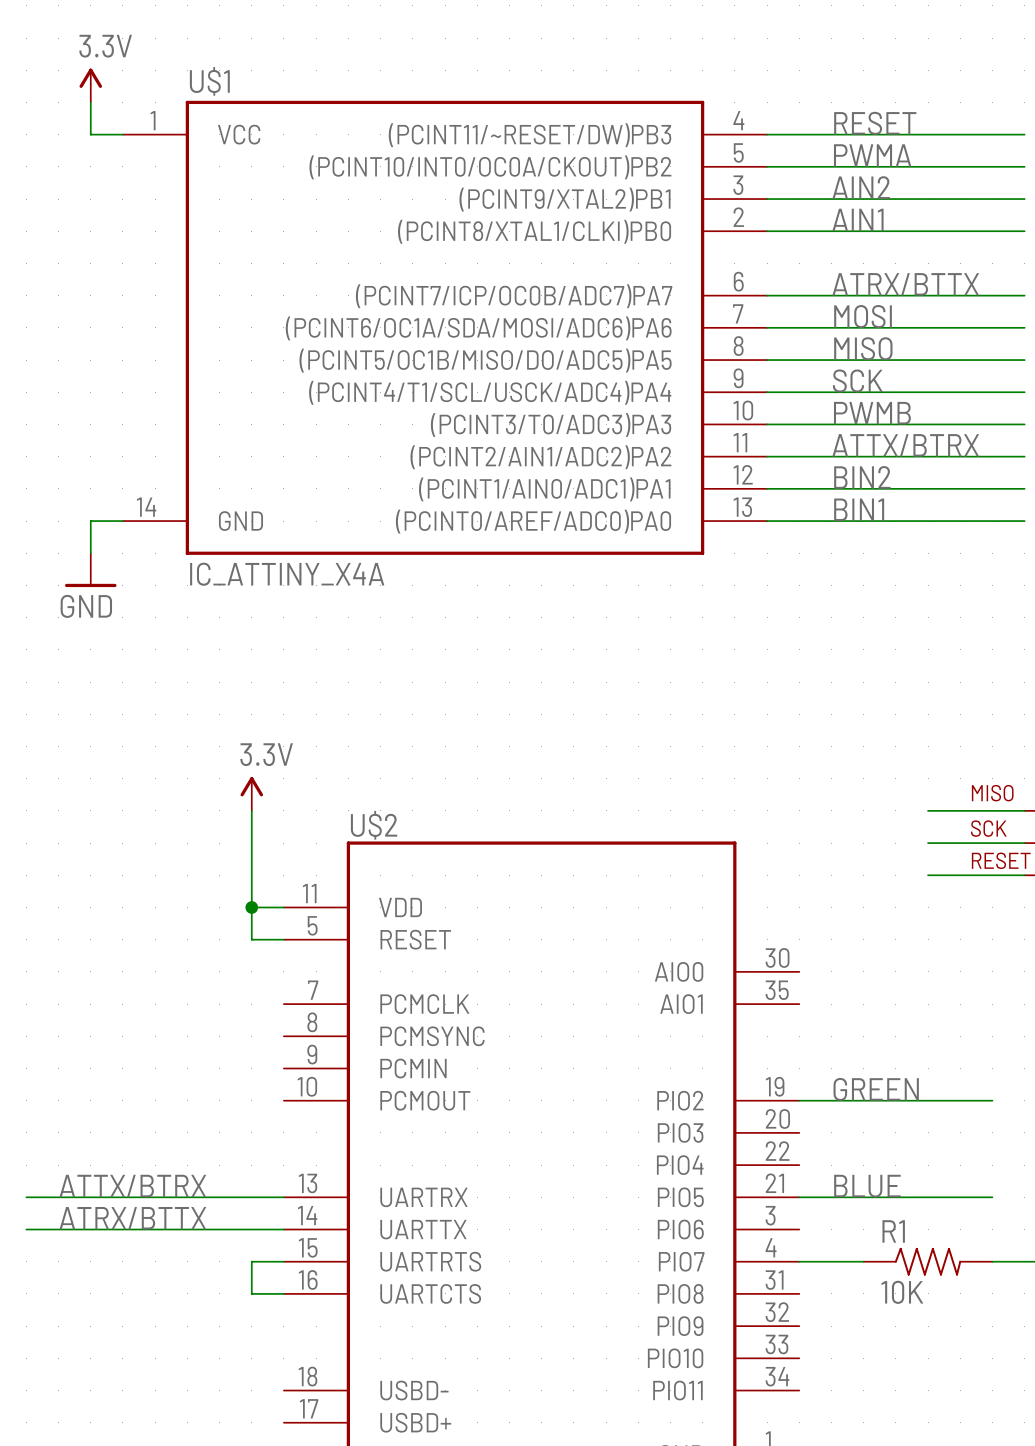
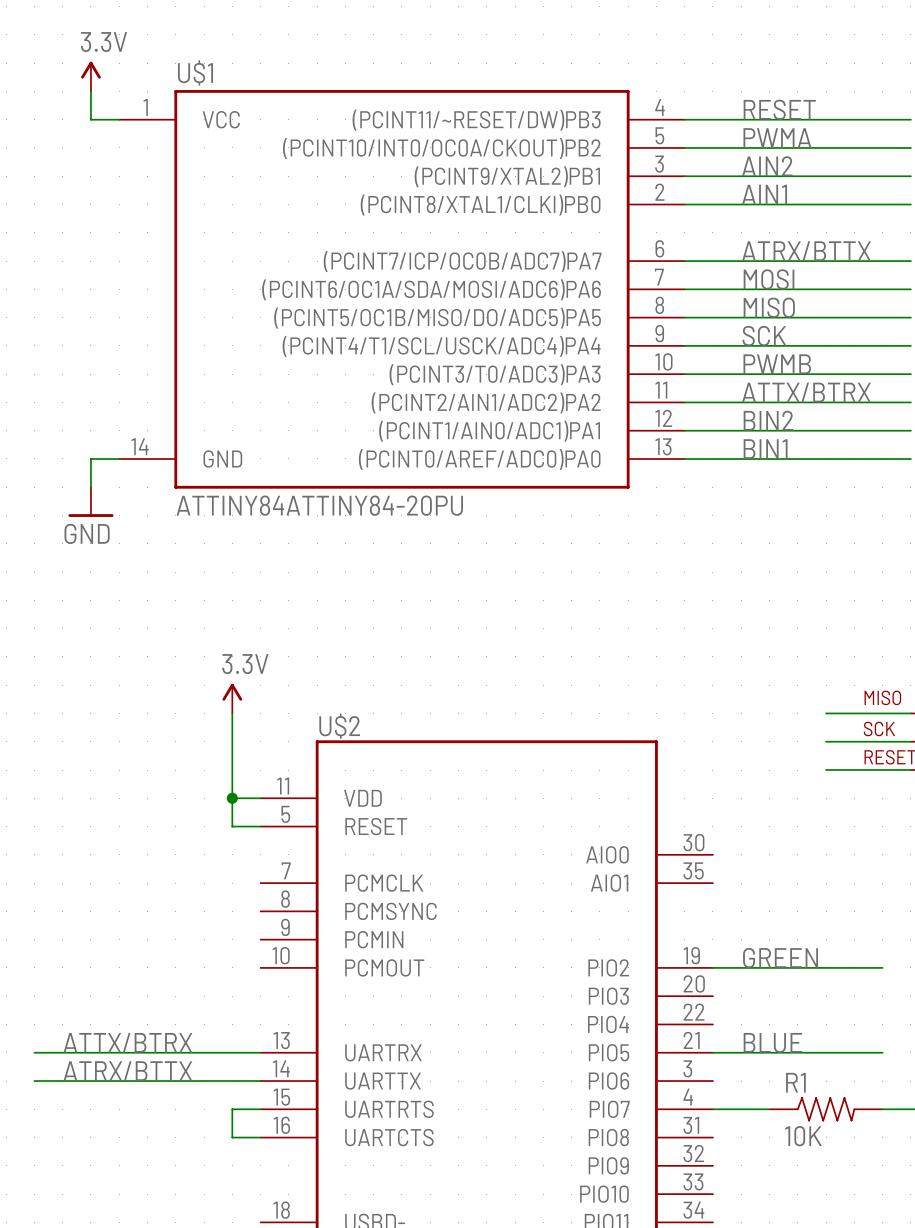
U$1 value: IC_ATTINY_X4A (287, 574) -> ATTINY84ATTINY84-20PU (319, 505)

